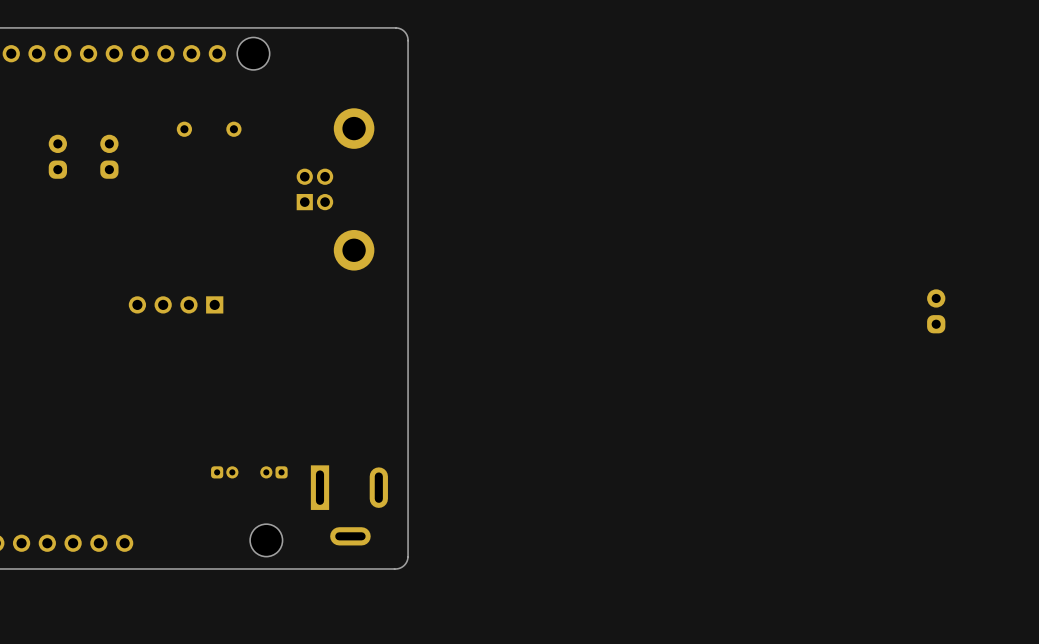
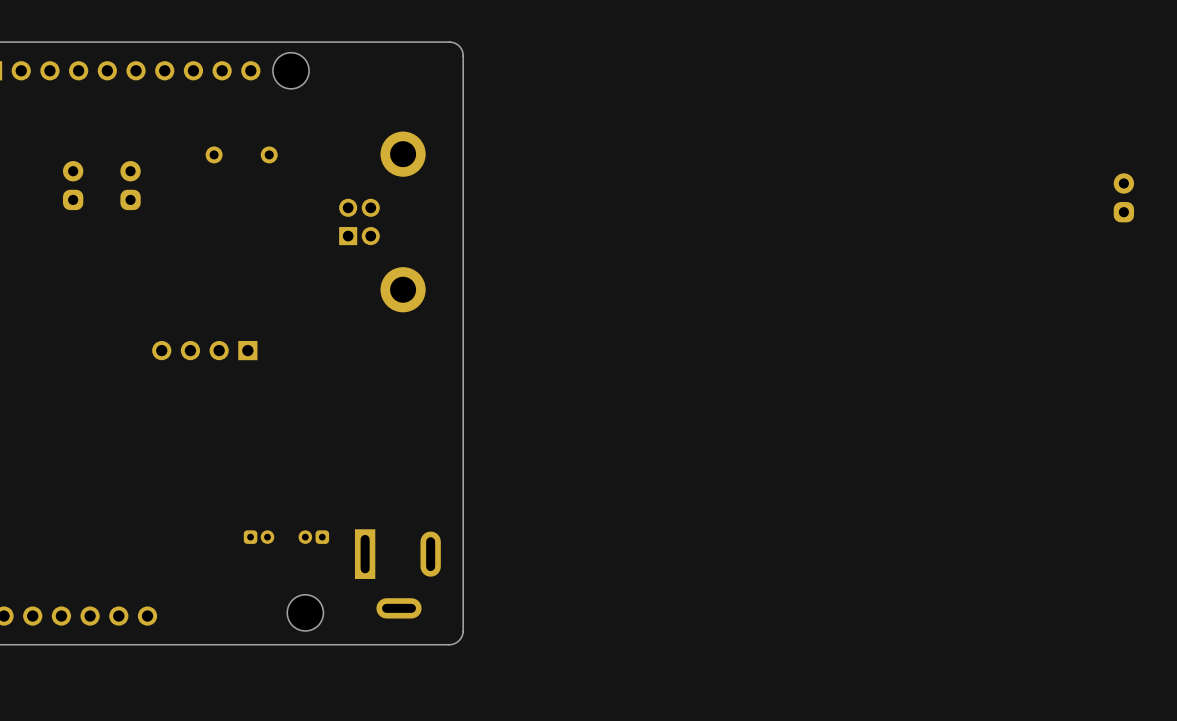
part position: (936, 311) -> (1123, 197)

